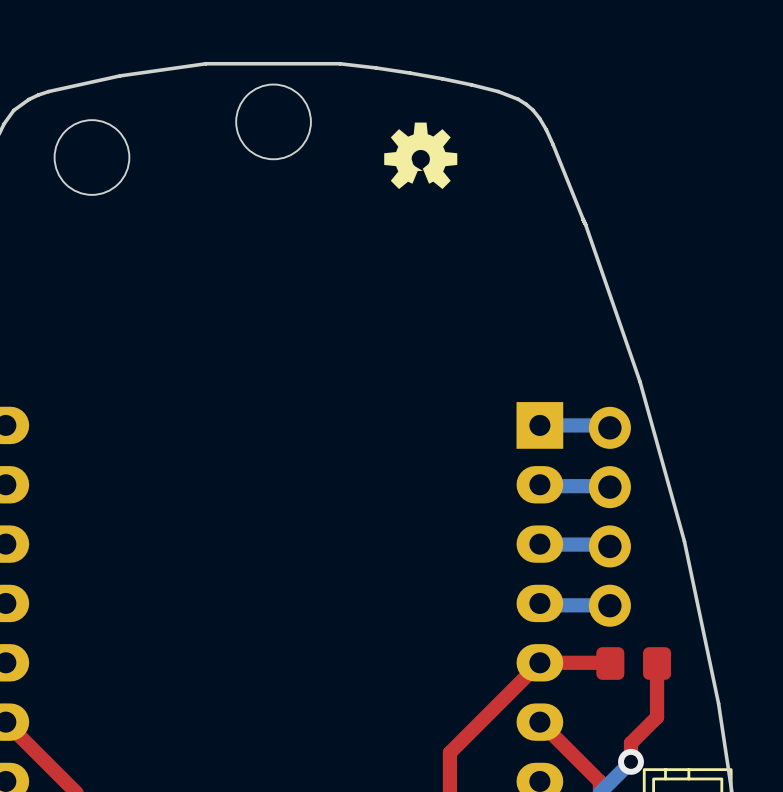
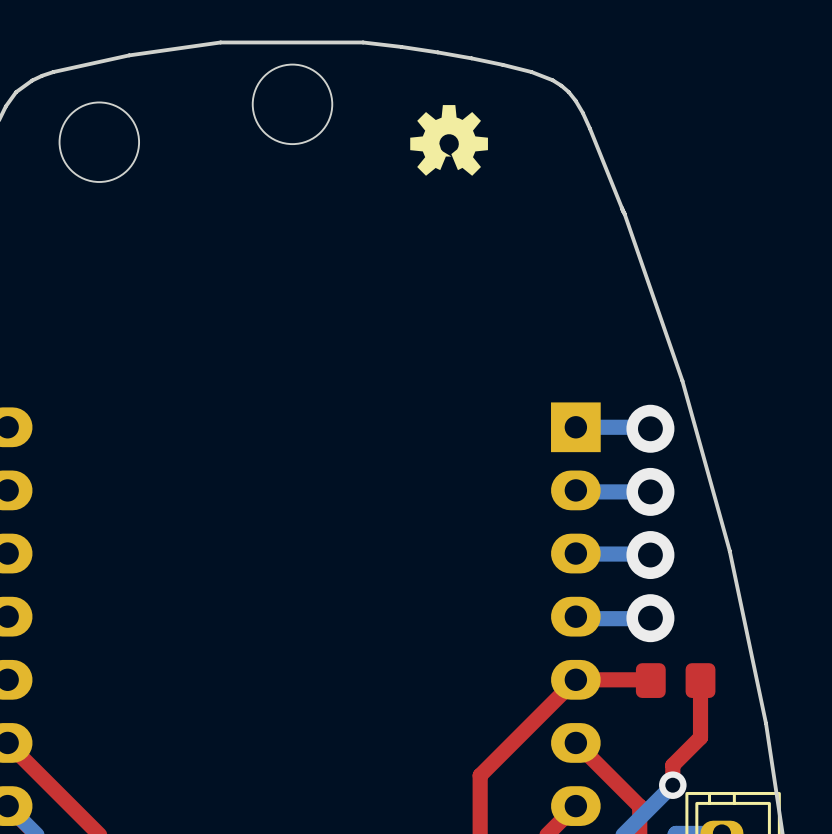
via: none -> (650, 428)
part: (609, 427) -> none
via: none -> (650, 491)
part: (609, 487) -> none
via: none -> (650, 555)
part: (609, 546) -> none
via: none -> (650, 618)
part: (609, 605) -> none

